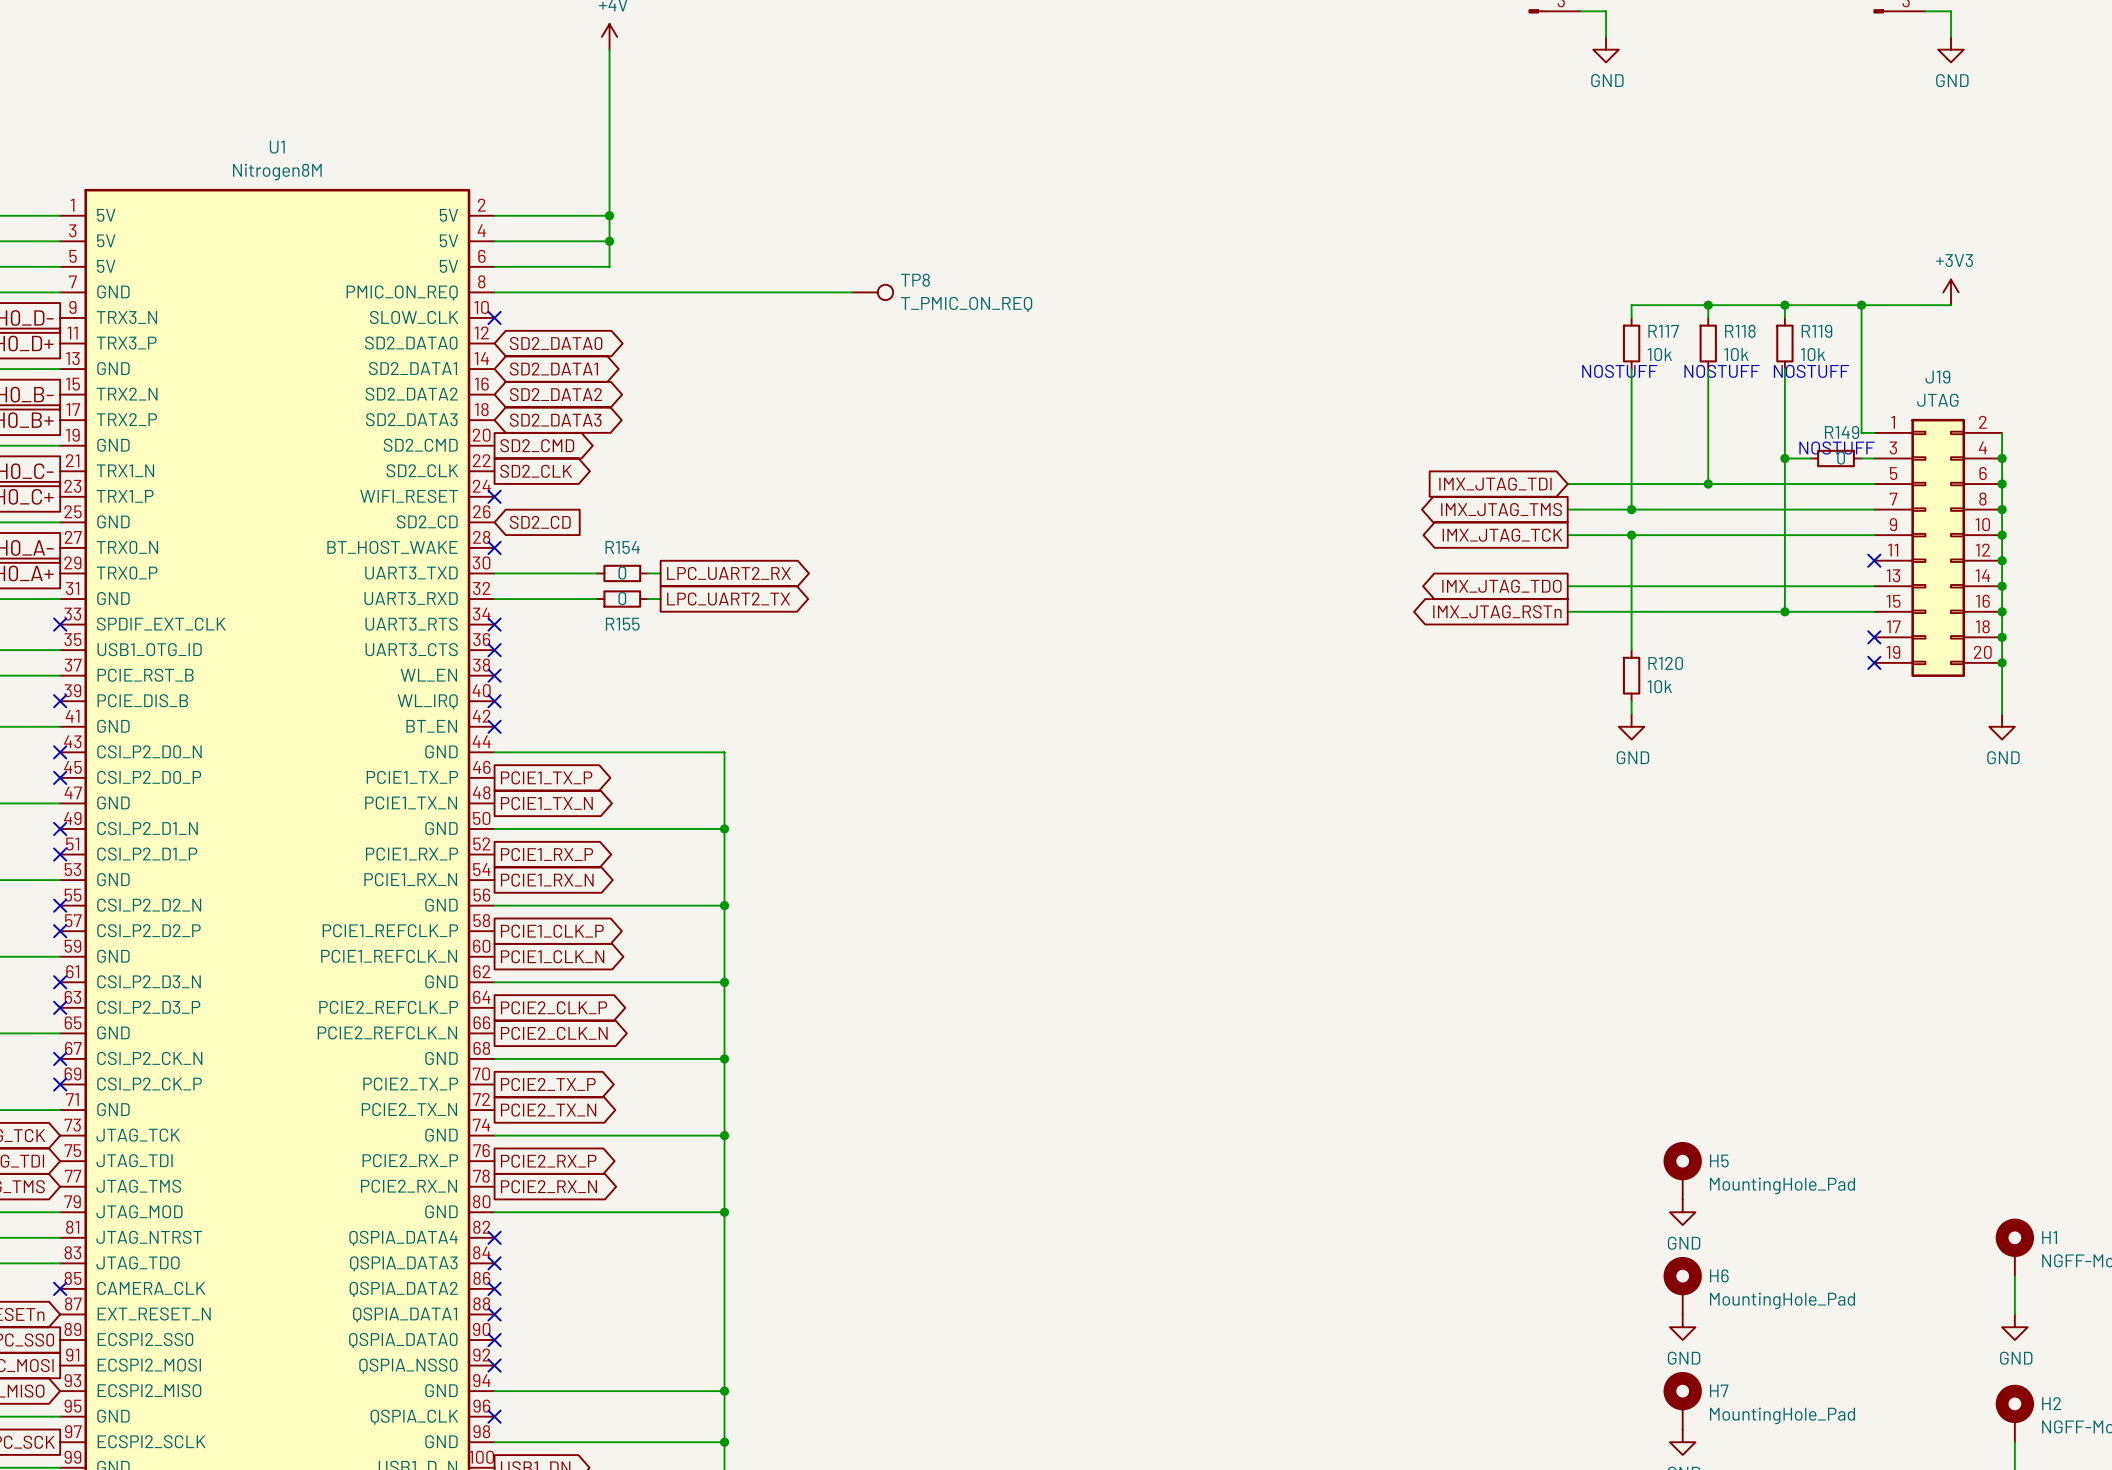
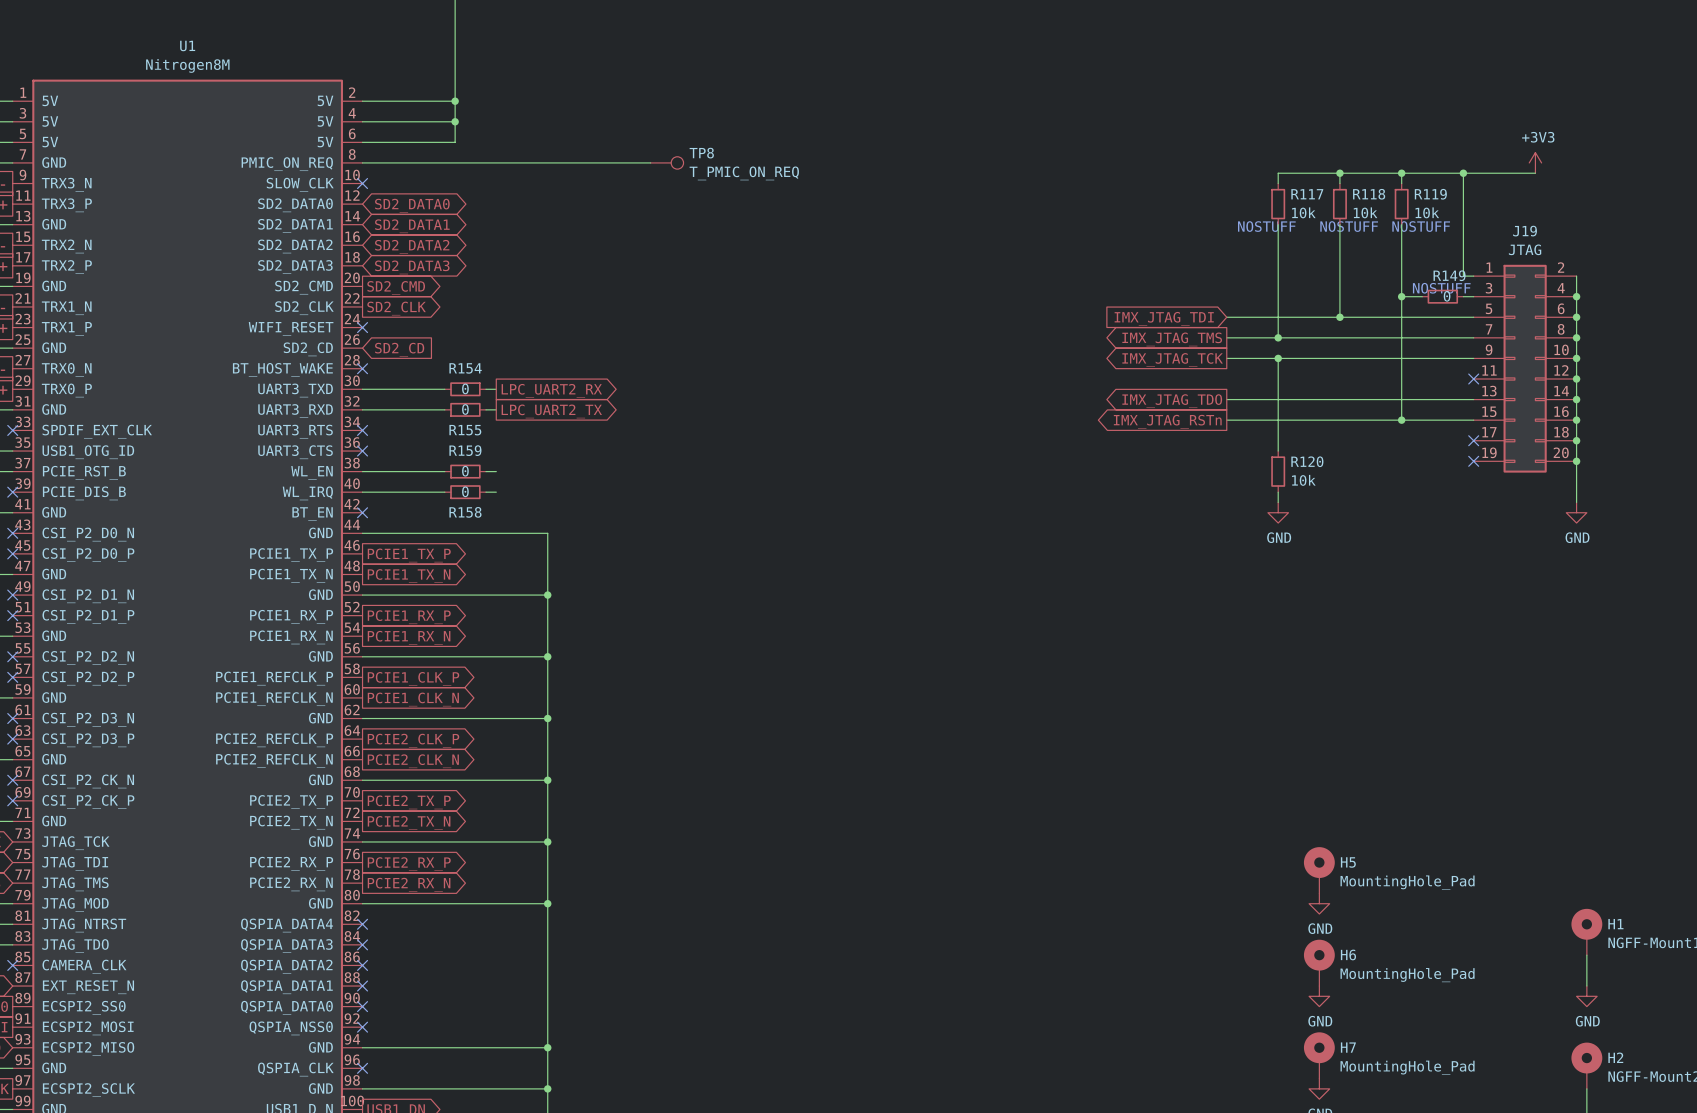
wire: none -> (362, 471) (444, 471)
no-connect mark: (494, 675) -> none
R159: none -> 0 (465, 471)
wire: none -> (486, 471) (496, 471)
wire: none -> (362, 492) (444, 492)
no-connect mark: (494, 701) -> none
R158: none -> 0 (465, 492)
wire: none -> (486, 492) (496, 492)

